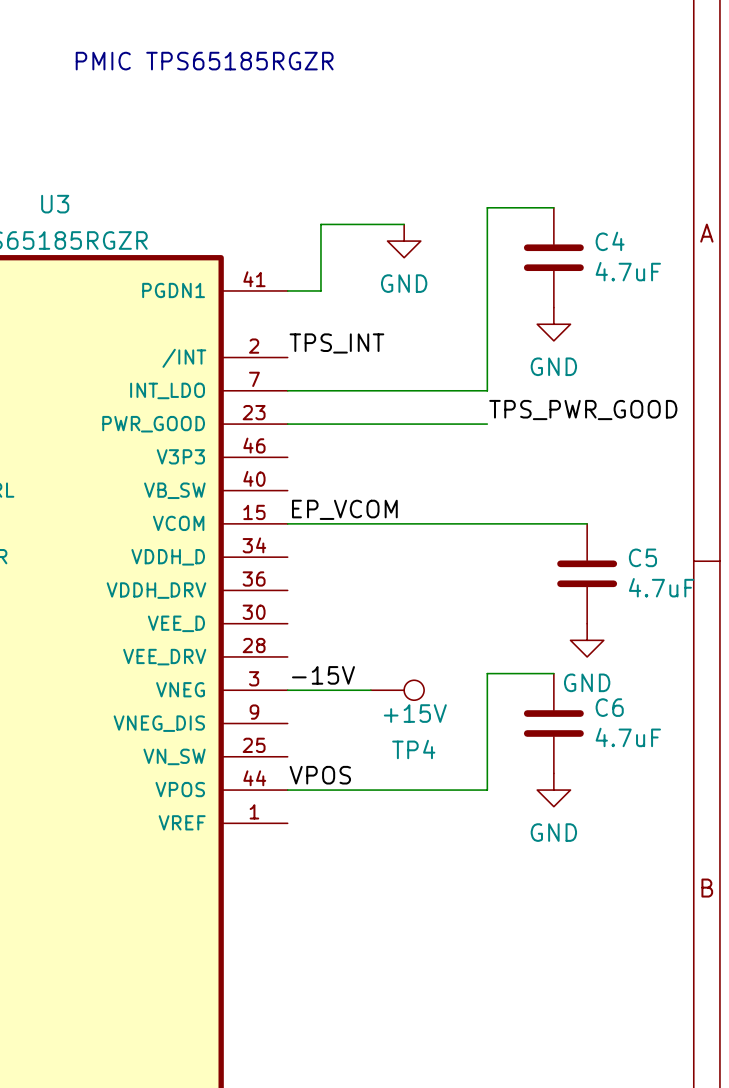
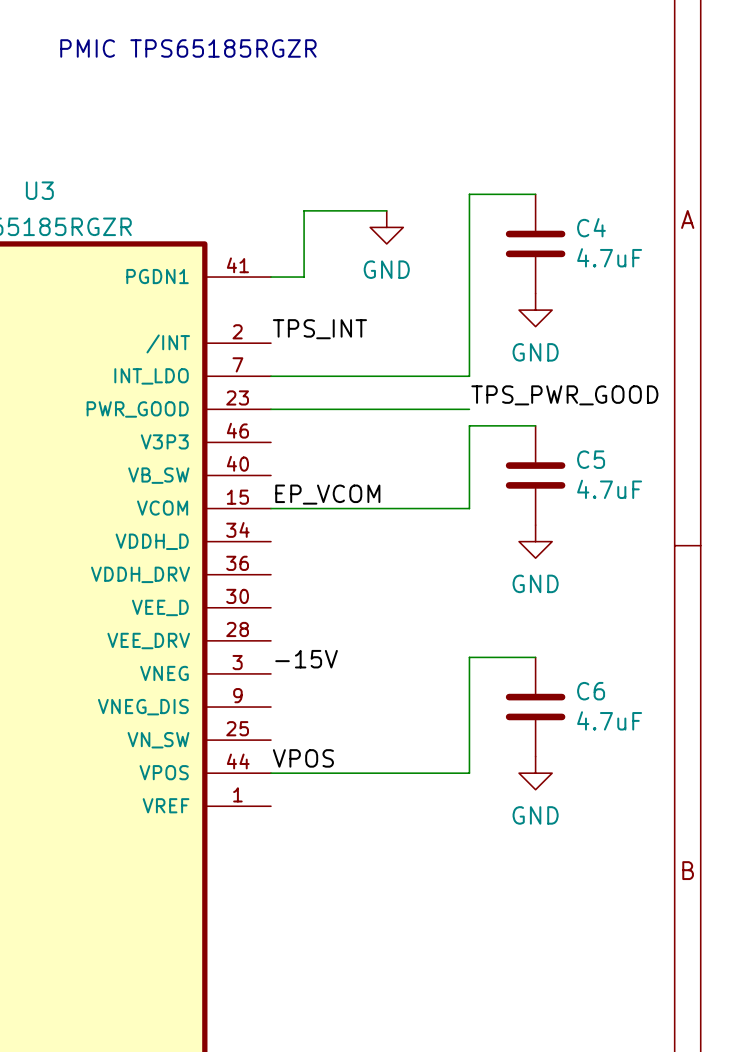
wire: (487, 523) (587, 523) -> (469, 508) (469, 425) (535, 425)
C5 position: (587, 573) -> (535, 475)
power symbol position: GND (587, 640) -> GND (535, 541)
wire: (287, 690) (370, 690) -> none
TP4: +15V (397, 690) -> none

